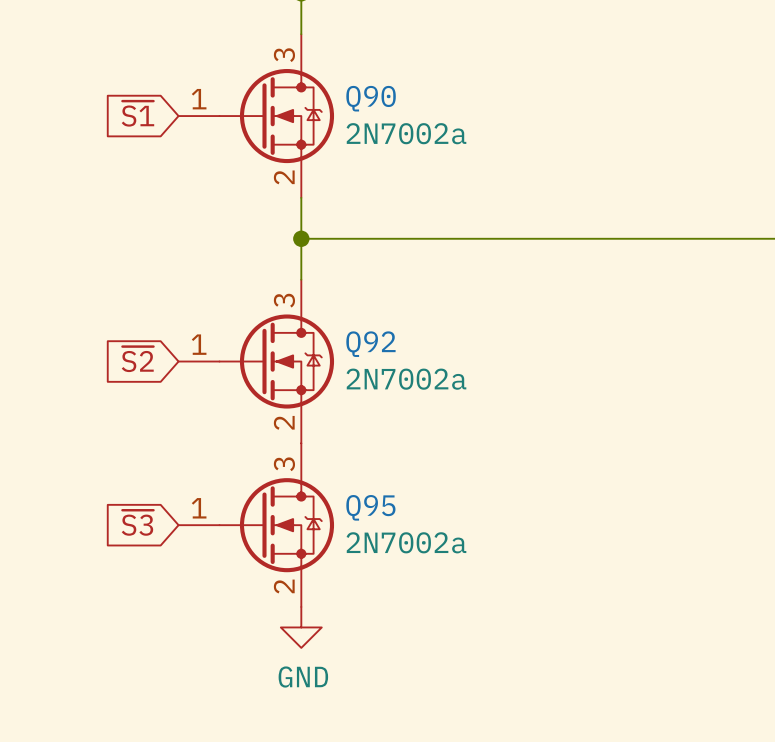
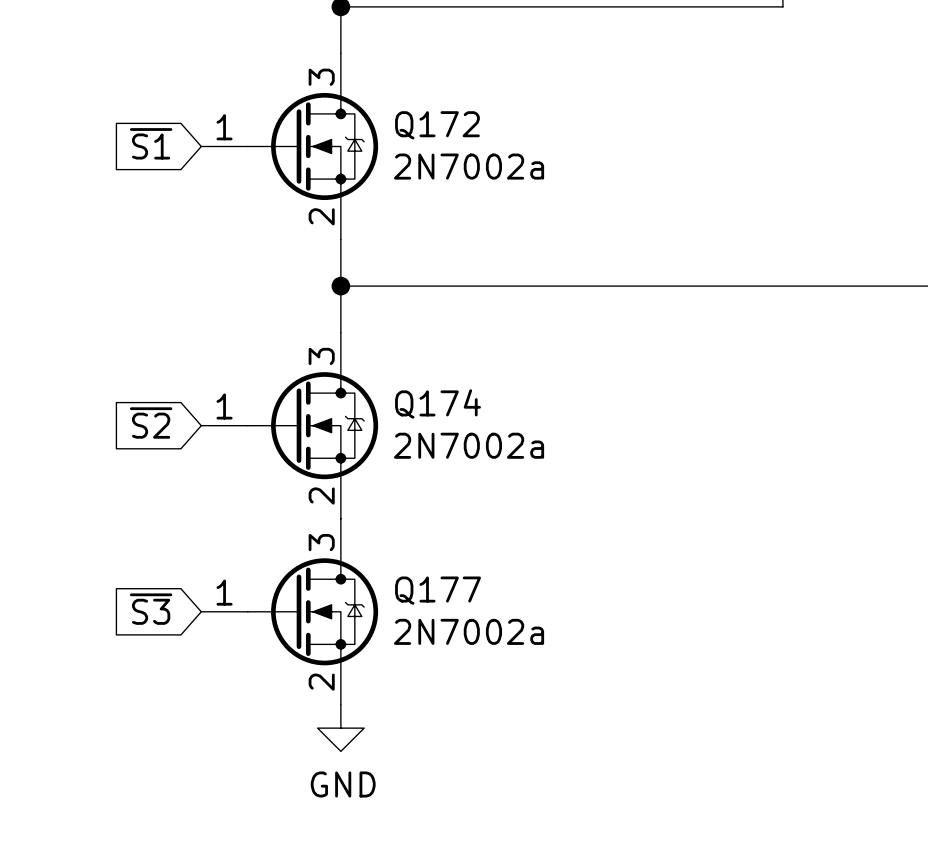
Q90 name: Q90 (371, 98) -> Q172 (437, 125)
Q92 name: Q92 (370, 344) -> Q174 (438, 403)
Q95 name: Q95 (370, 507) -> Q177 (438, 590)

